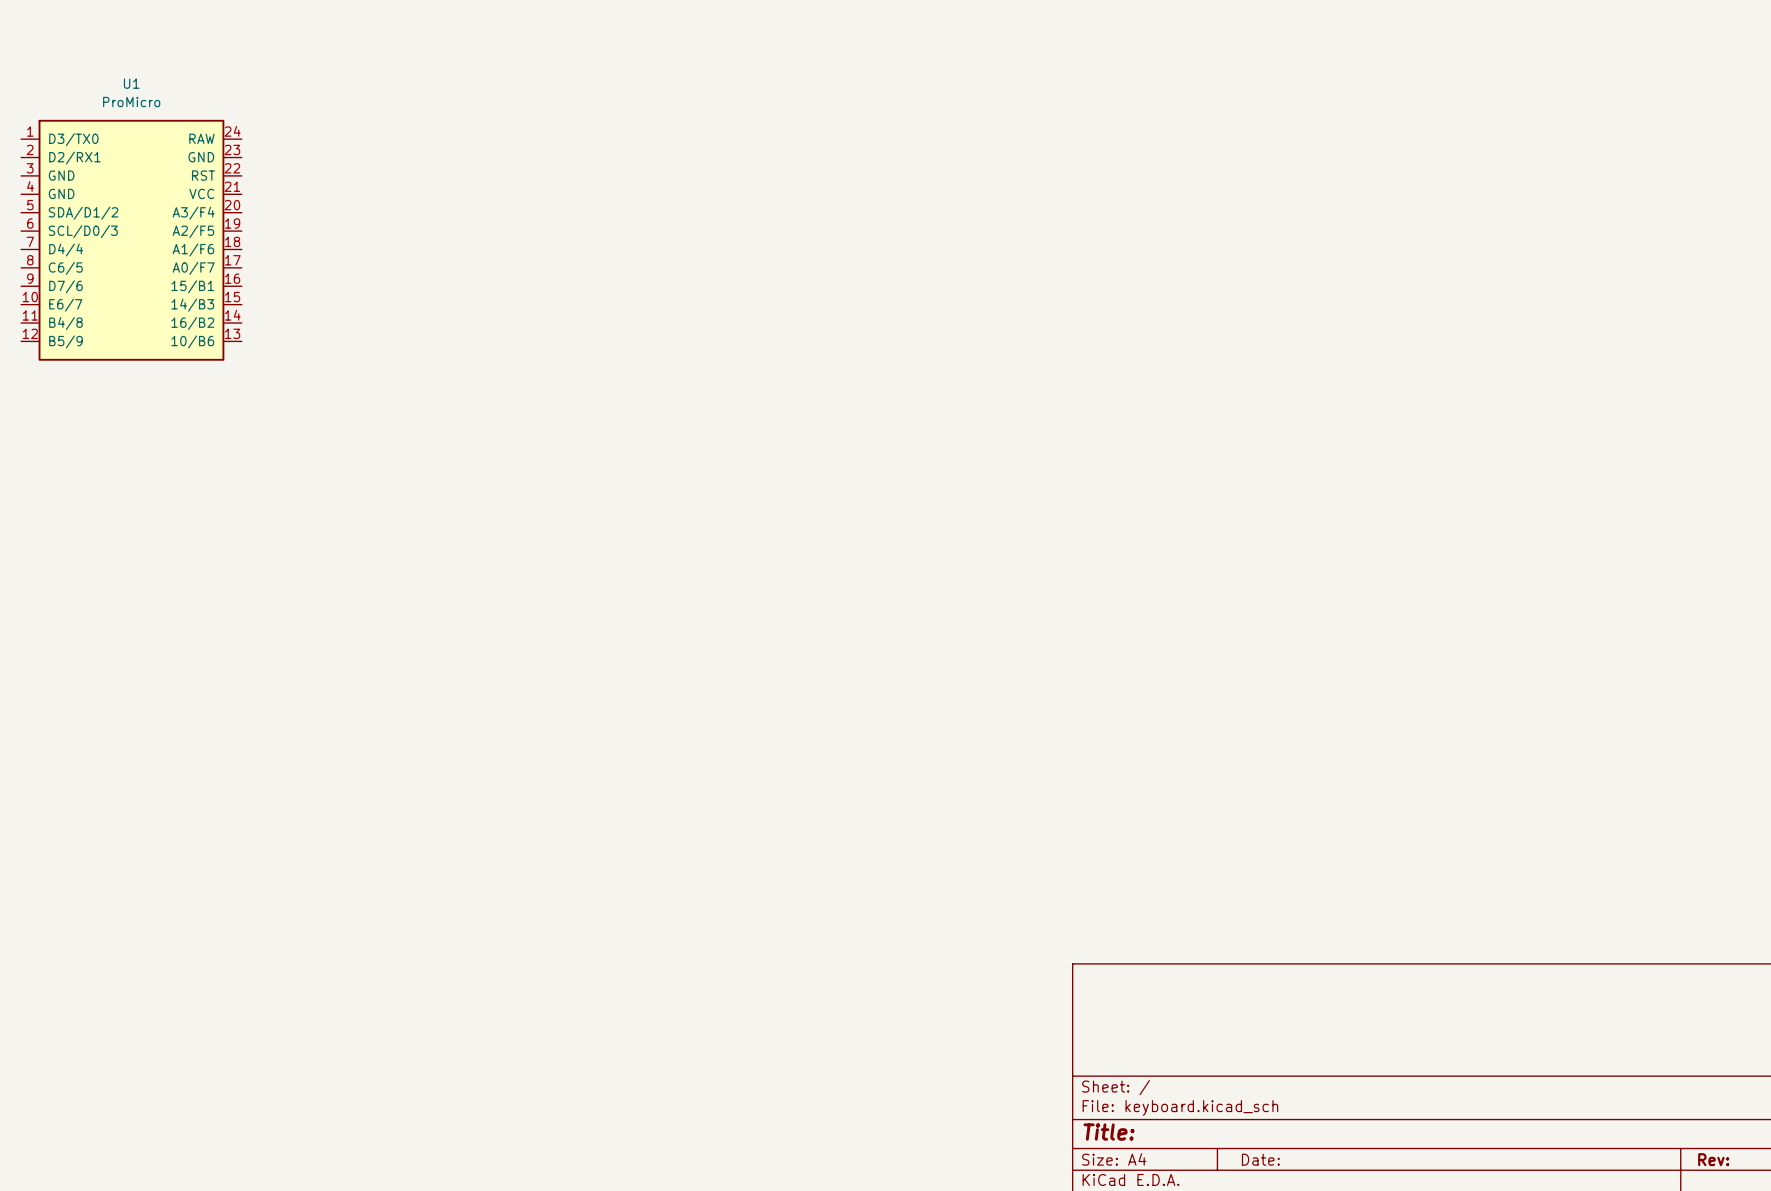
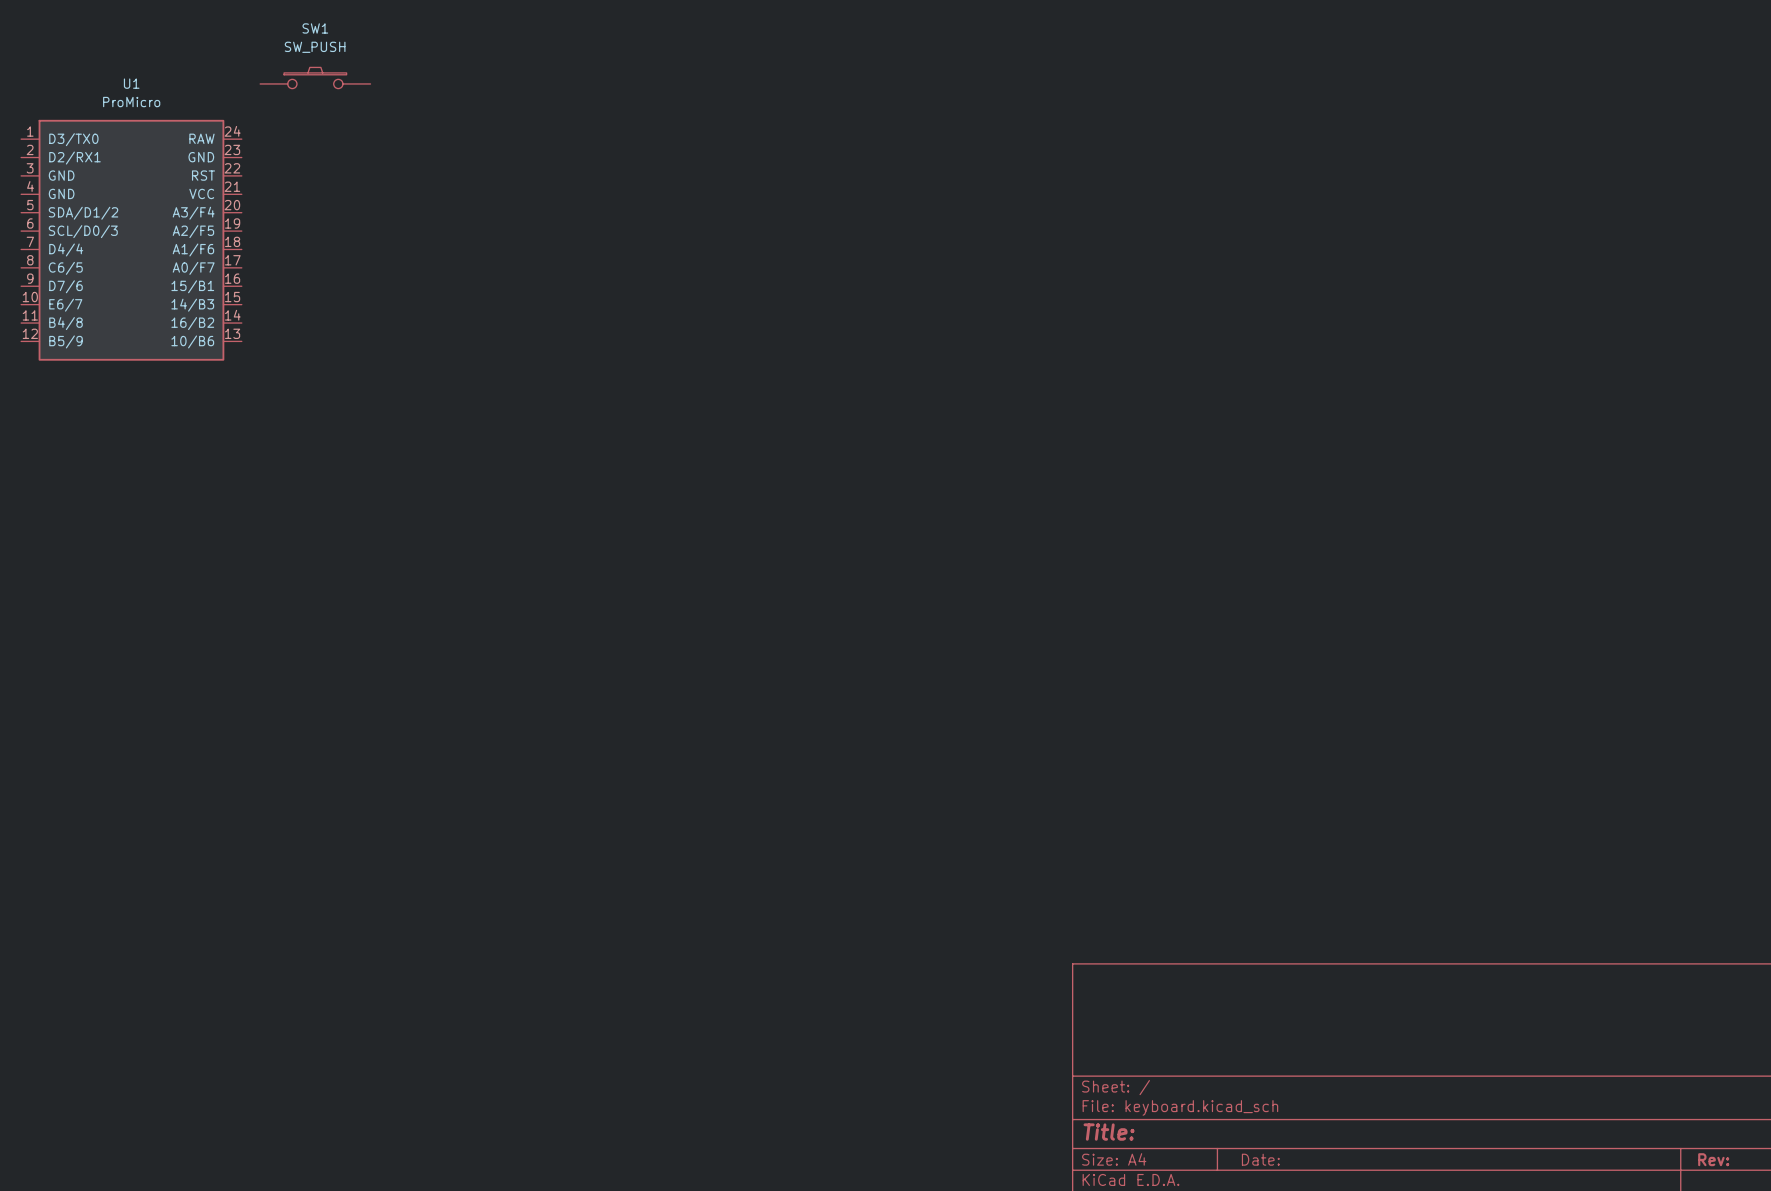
SW1: none -> SW_PUSH (315, 78)

